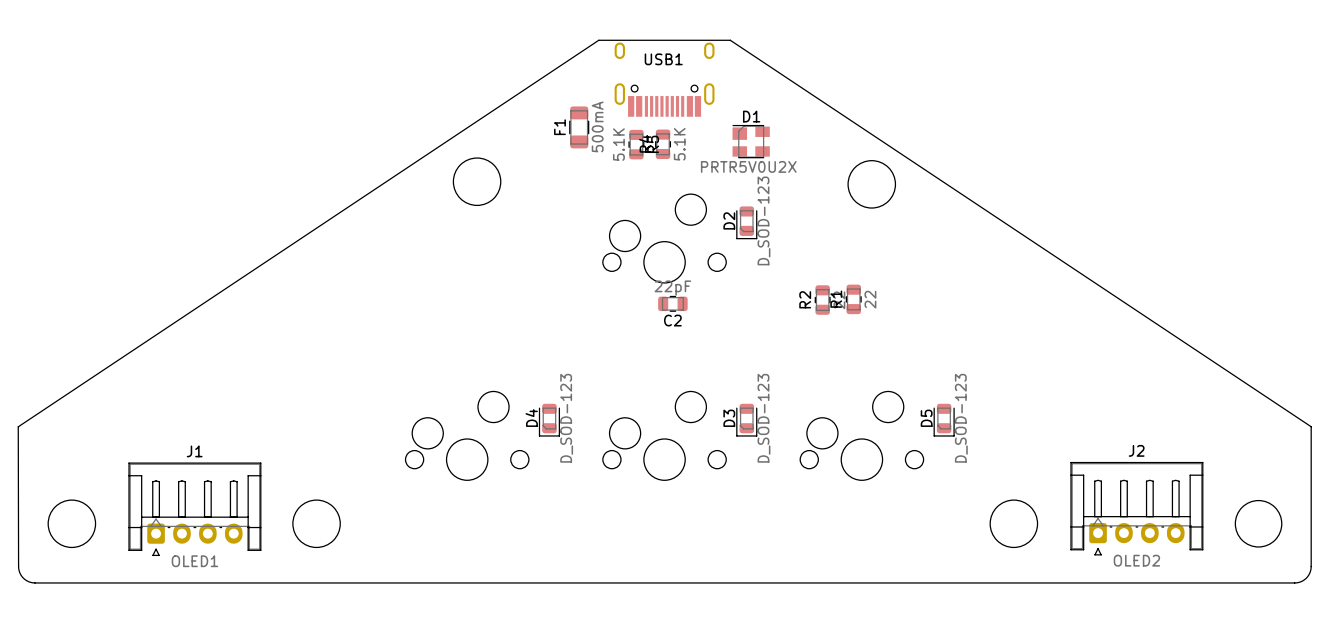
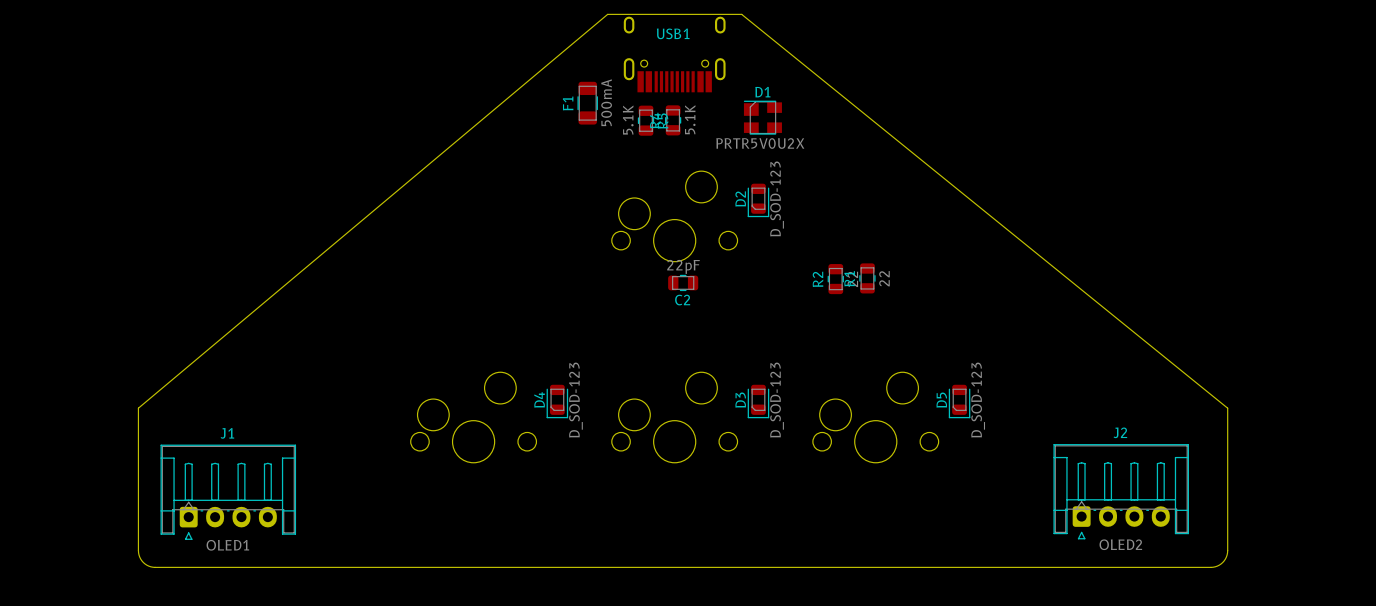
board edge: (598, 40) (18, 426) (18, 566) (21, 576) (28, 581) (35, 582) (154, 582) -> (607, 14) (138, 408) (138, 552) (144, 563) (155, 567)
board edge: (730, 40) (1311, 426) (1311, 566) (1307, 576) (1301, 581) (1294, 582) (1190, 582) -> (741, 14) (1227, 408) (1227, 552) (1221, 563) (1210, 567)
round board edge: [453, 157, 502, 206] -> none
round board edge: [847, 160, 896, 209] -> none
round board edge: [47, 499, 96, 548] -> none
round board edge: [292, 499, 341, 548] -> none
round board edge: [989, 499, 1038, 548] -> none
round board edge: [1235, 500, 1283, 548] -> none
J2 position: (1136, 508) -> (1121, 491)
J1 position: (194, 509) -> (228, 492)

